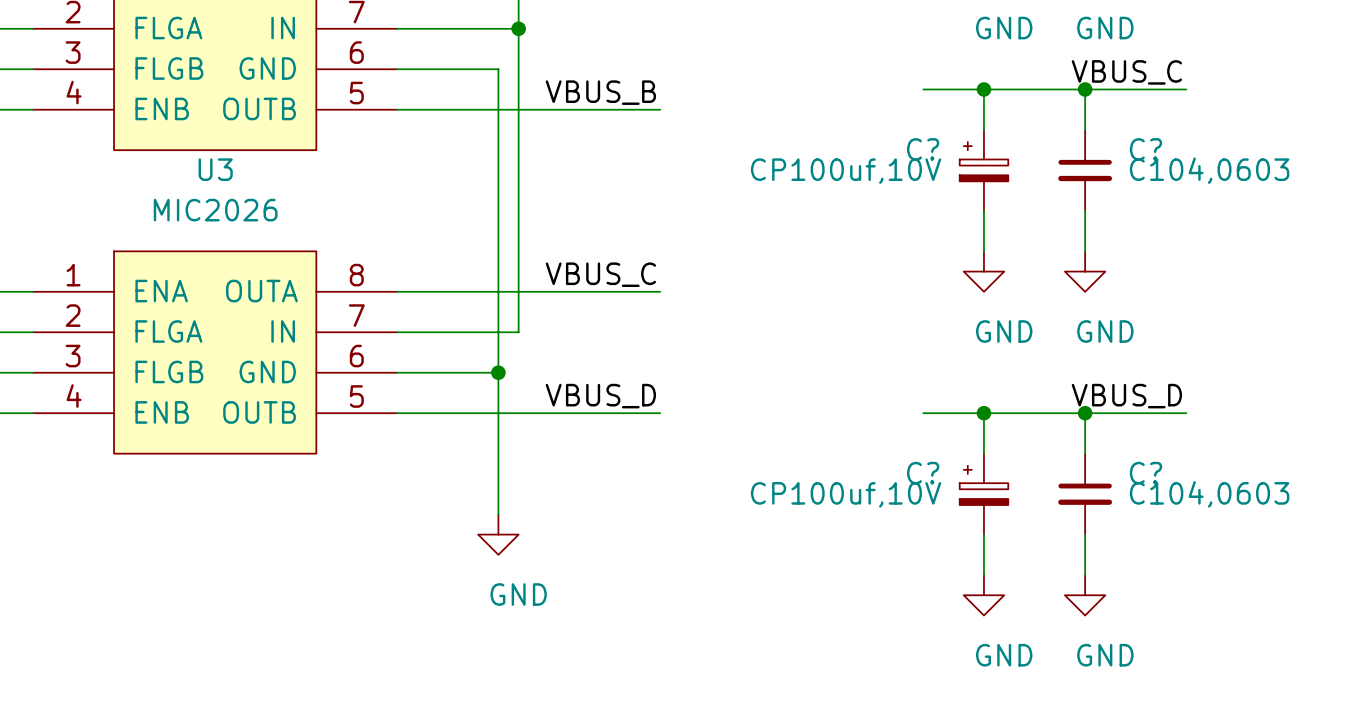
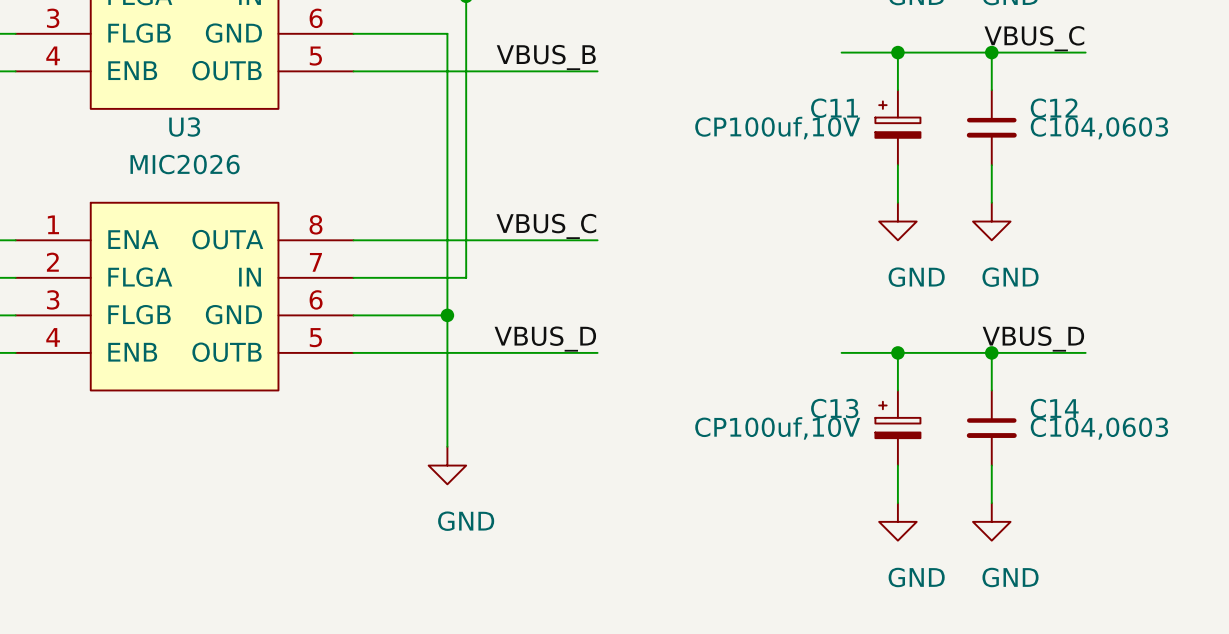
C? name: C? (923, 149) -> C11 (834, 108)
C? name: C? (1145, 149) -> C12 (1054, 108)
C? name: C? (923, 473) -> C13 (834, 408)
C? name: C? (1145, 473) -> C14 (1054, 408)

